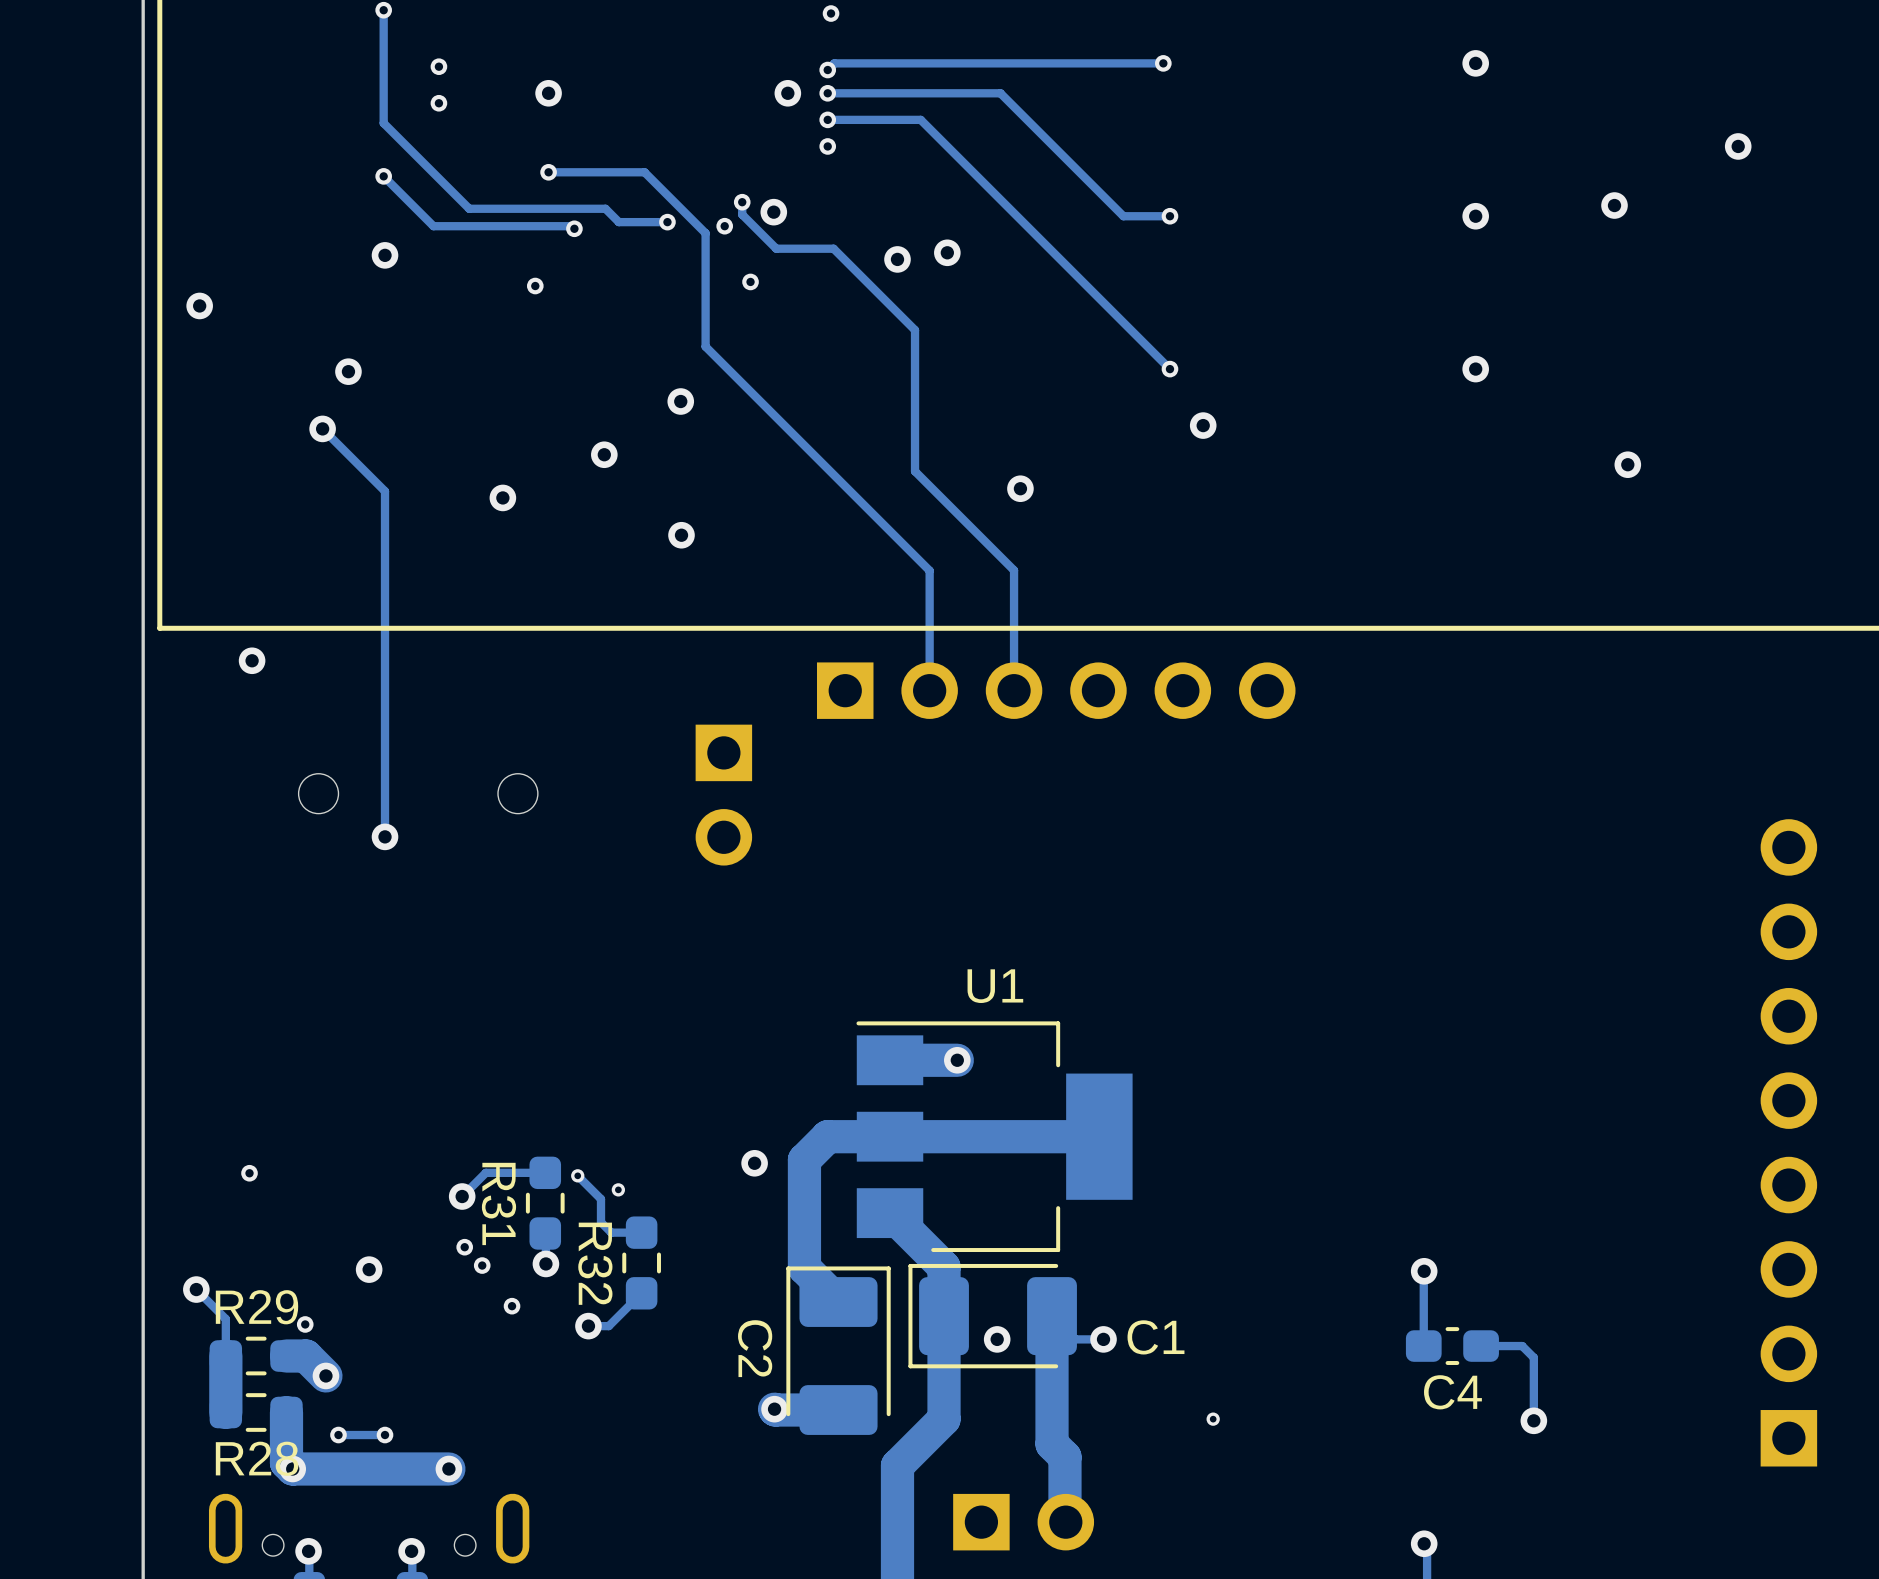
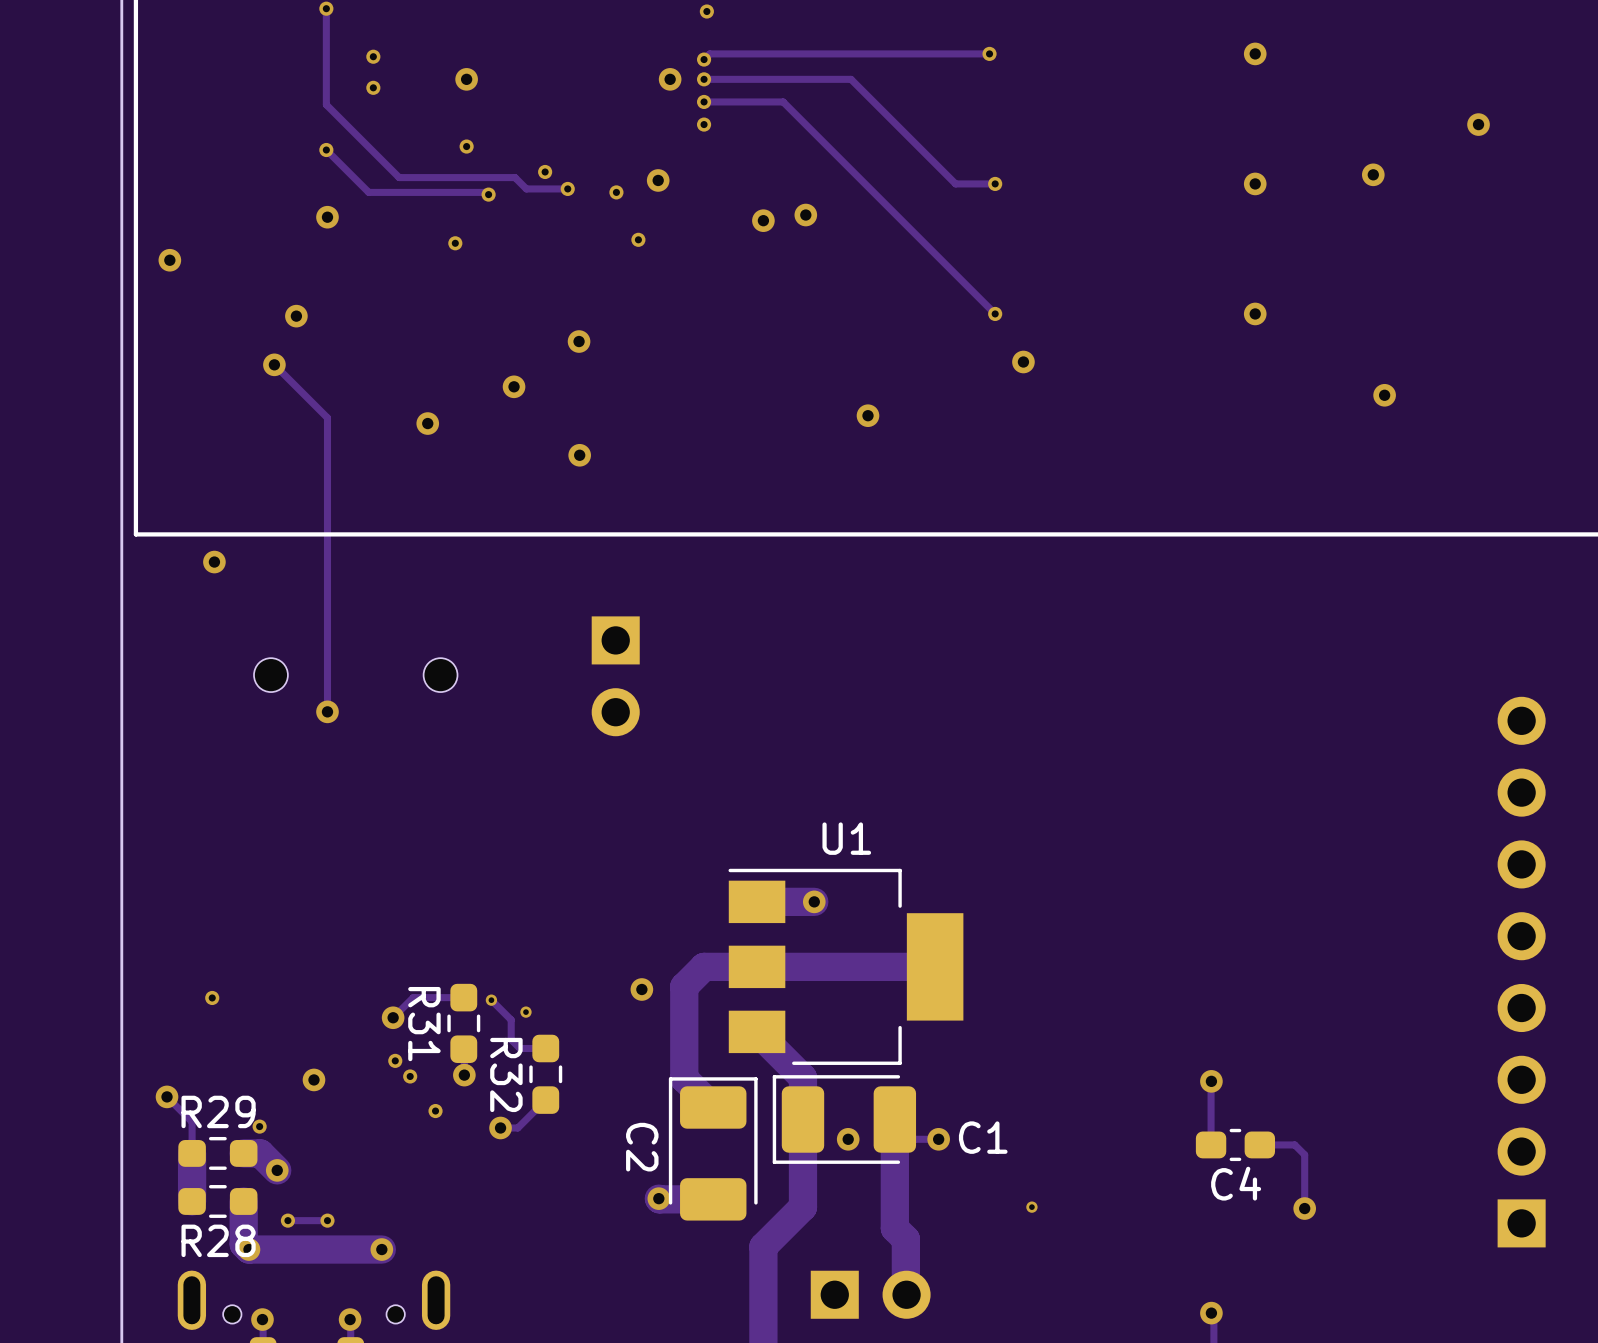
track: (548, 172) (644, 172) (705, 233) (705, 346) (929, 570) (929, 690) -> none
track: (742, 202) (742, 214) (776, 248) (833, 248) (915, 330) (915, 471) (1014, 570) (1014, 690) -> none
via position: (742, 202) -> (545, 171)
part: (1056, 690) -> none

